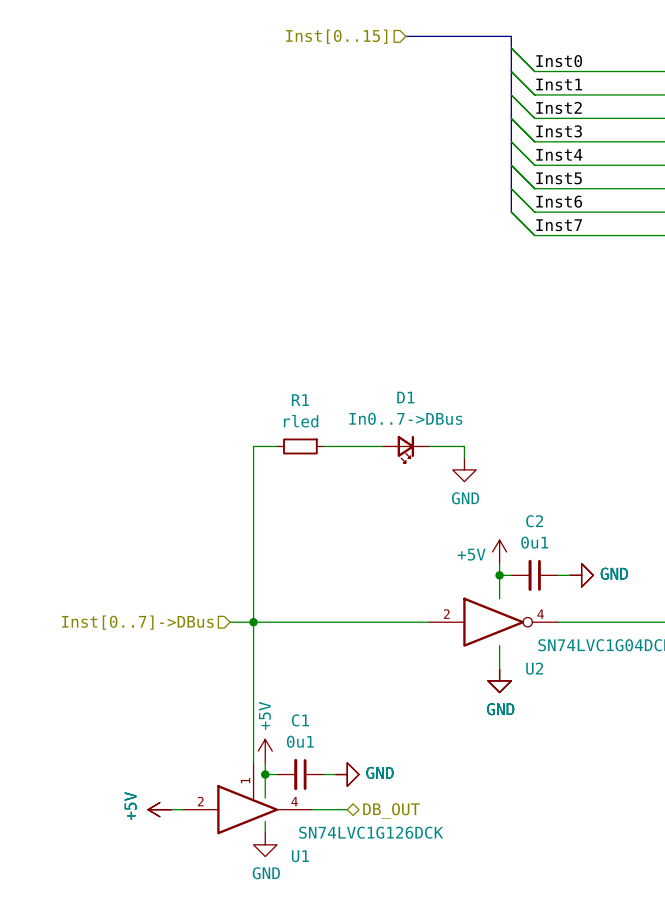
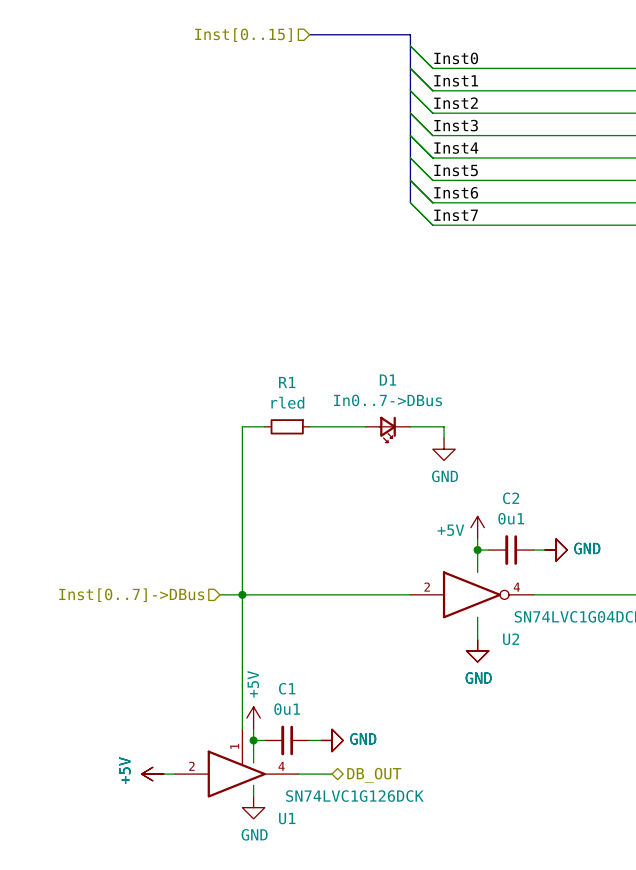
bus: none -> (309, 34) (388, 34)
hierarchical label position: Inst[0..15] (336, 36) -> Inst[0..15] (243, 35)
bus: (429, 36) (511, 36) (511, 212) -> (410, 34) (410, 202)
wire: (511, 48) (534, 71) -> (410, 45) (432, 68) (511, 68)
label position: Inst0 (559, 61) -> Inst0 (456, 58)
wire: (511, 71) (534, 94) -> (410, 68) (432, 90) (511, 90)
label position: Inst1 (559, 84) -> Inst1 (456, 80)
wire: (511, 94) (534, 118) -> (410, 90) (432, 113) (511, 113)
label position: Inst2 (559, 107) -> Inst2 (456, 103)
wire: (511, 118) (534, 141) -> (410, 113) (432, 135) (511, 135)
label position: Inst3 (559, 131) -> Inst3 (456, 125)
wire: (511, 141) (534, 165) -> (410, 135) (432, 157) (511, 157)
label position: Inst4 (559, 154) -> Inst4 (456, 148)
wire: (511, 165) (534, 188) -> (410, 157) (432, 180) (511, 180)
label position: Inst5 (559, 178) -> Inst5 (456, 170)
wire: (511, 188) (534, 212) -> (410, 180) (432, 202) (511, 202)
label position: Inst6 (559, 201) -> Inst6 (456, 192)
wire: (511, 212) (534, 235) -> (410, 202) (432, 225) (511, 225)
label position: Inst7 (559, 225) -> Inst7 (456, 215)

